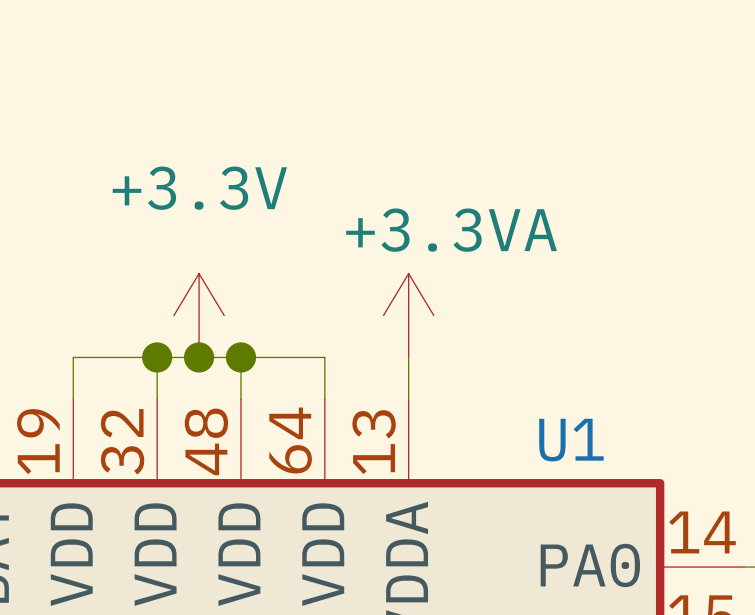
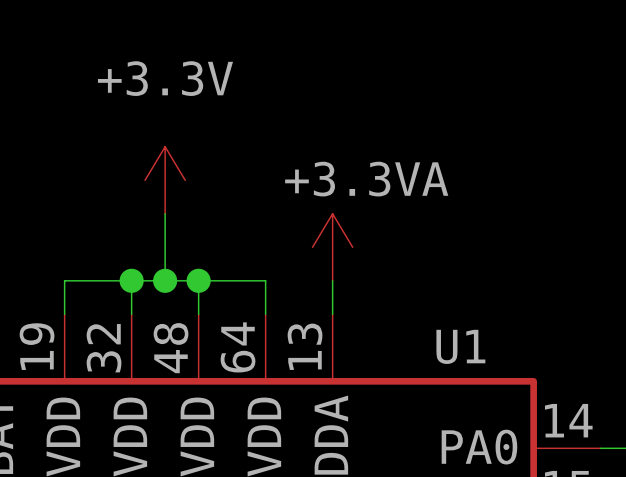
power symbol position: +3.3V (199, 315) -> +3.3V (165, 180)

